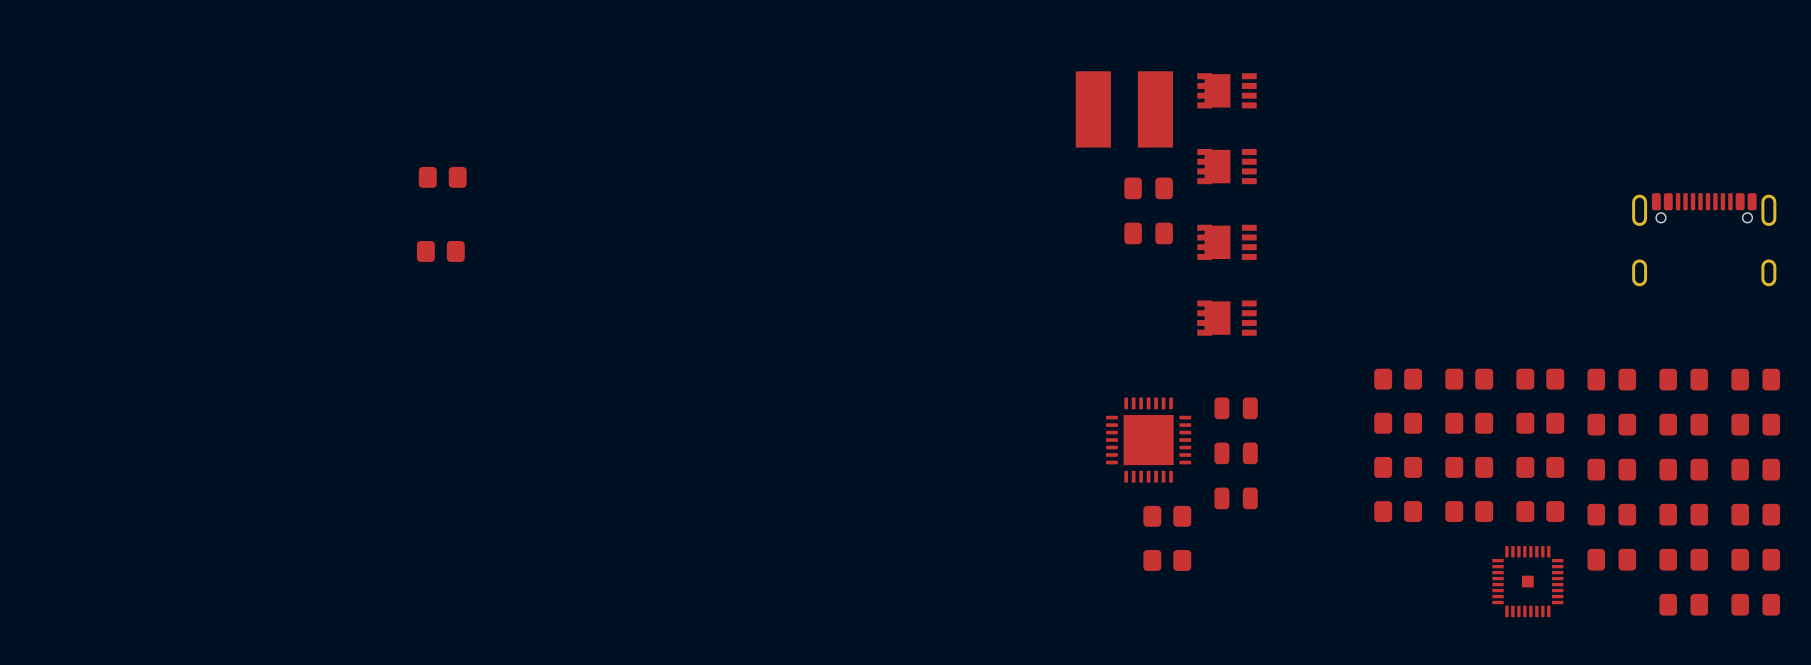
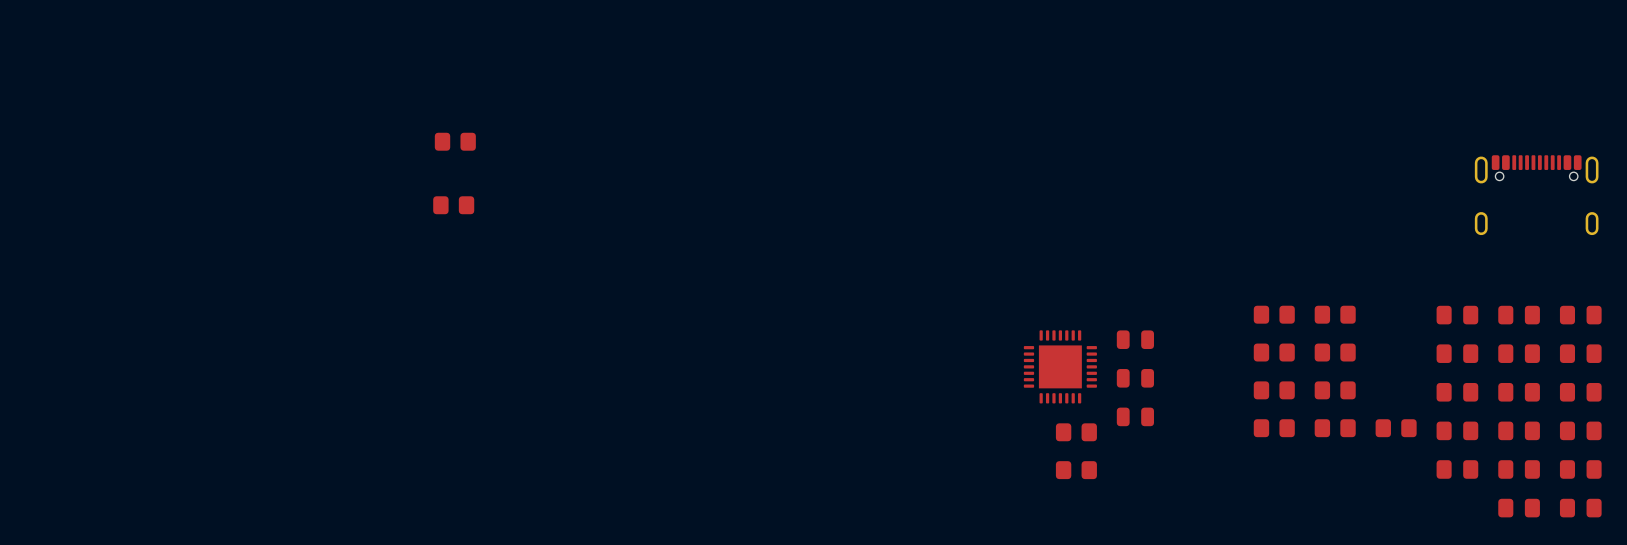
part: (1226, 90) -> none
part: (1124, 109) -> none
part: (1226, 166) -> none
part: (1148, 188) -> none
part: (1148, 233) -> none
part: (1226, 242) -> none
part: (1226, 318) -> none
part: (1540, 379) -> none
part: (1540, 423) -> none
part: (1540, 467) -> none
part: (1527, 581) -> none

